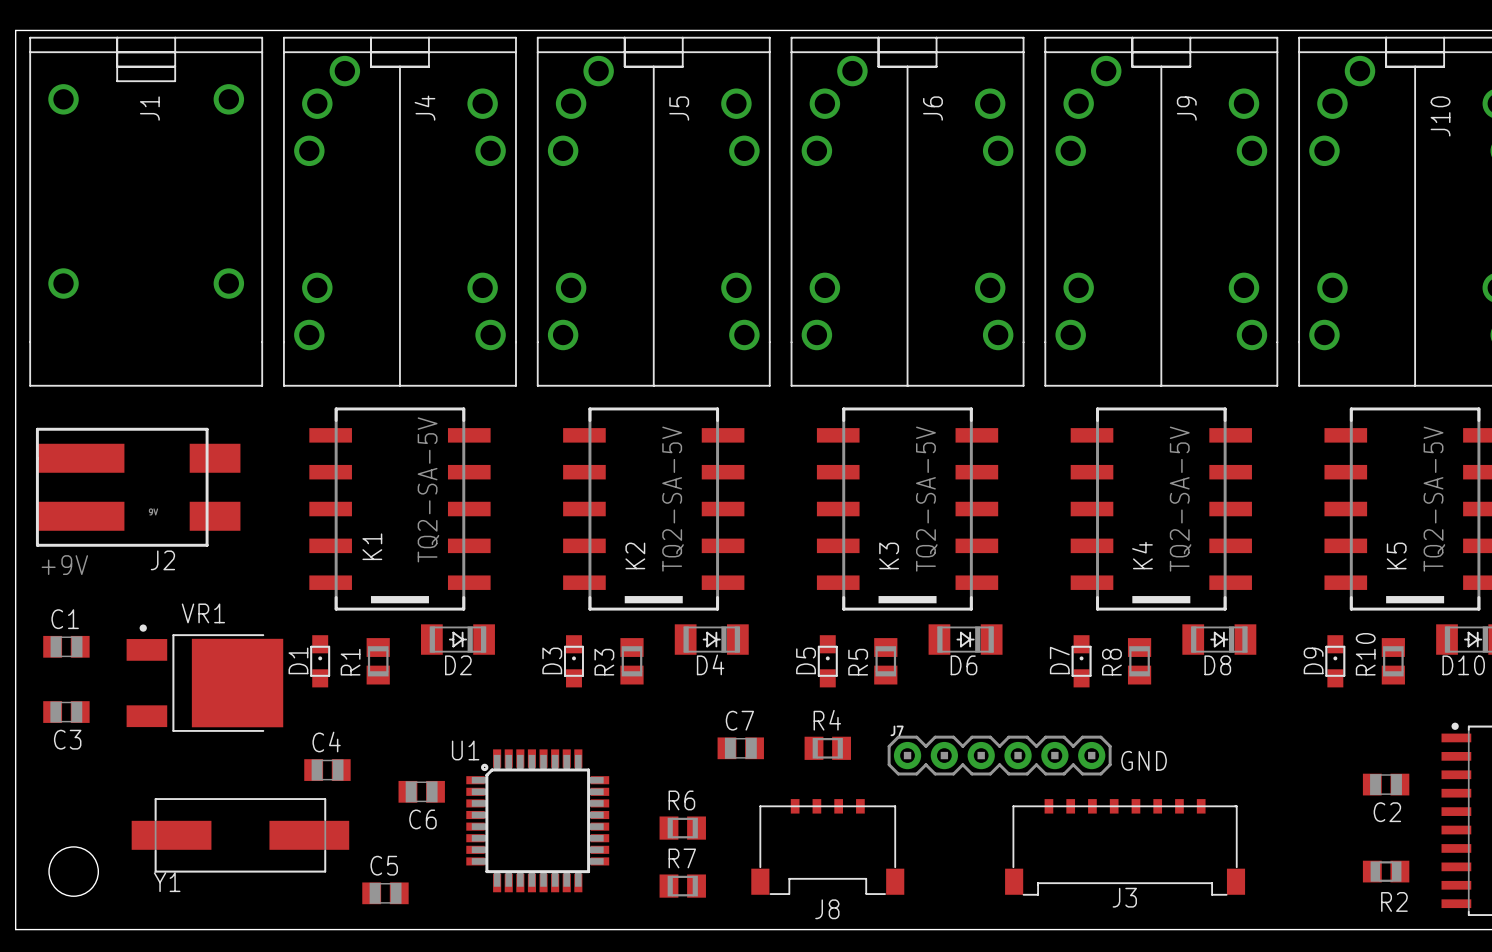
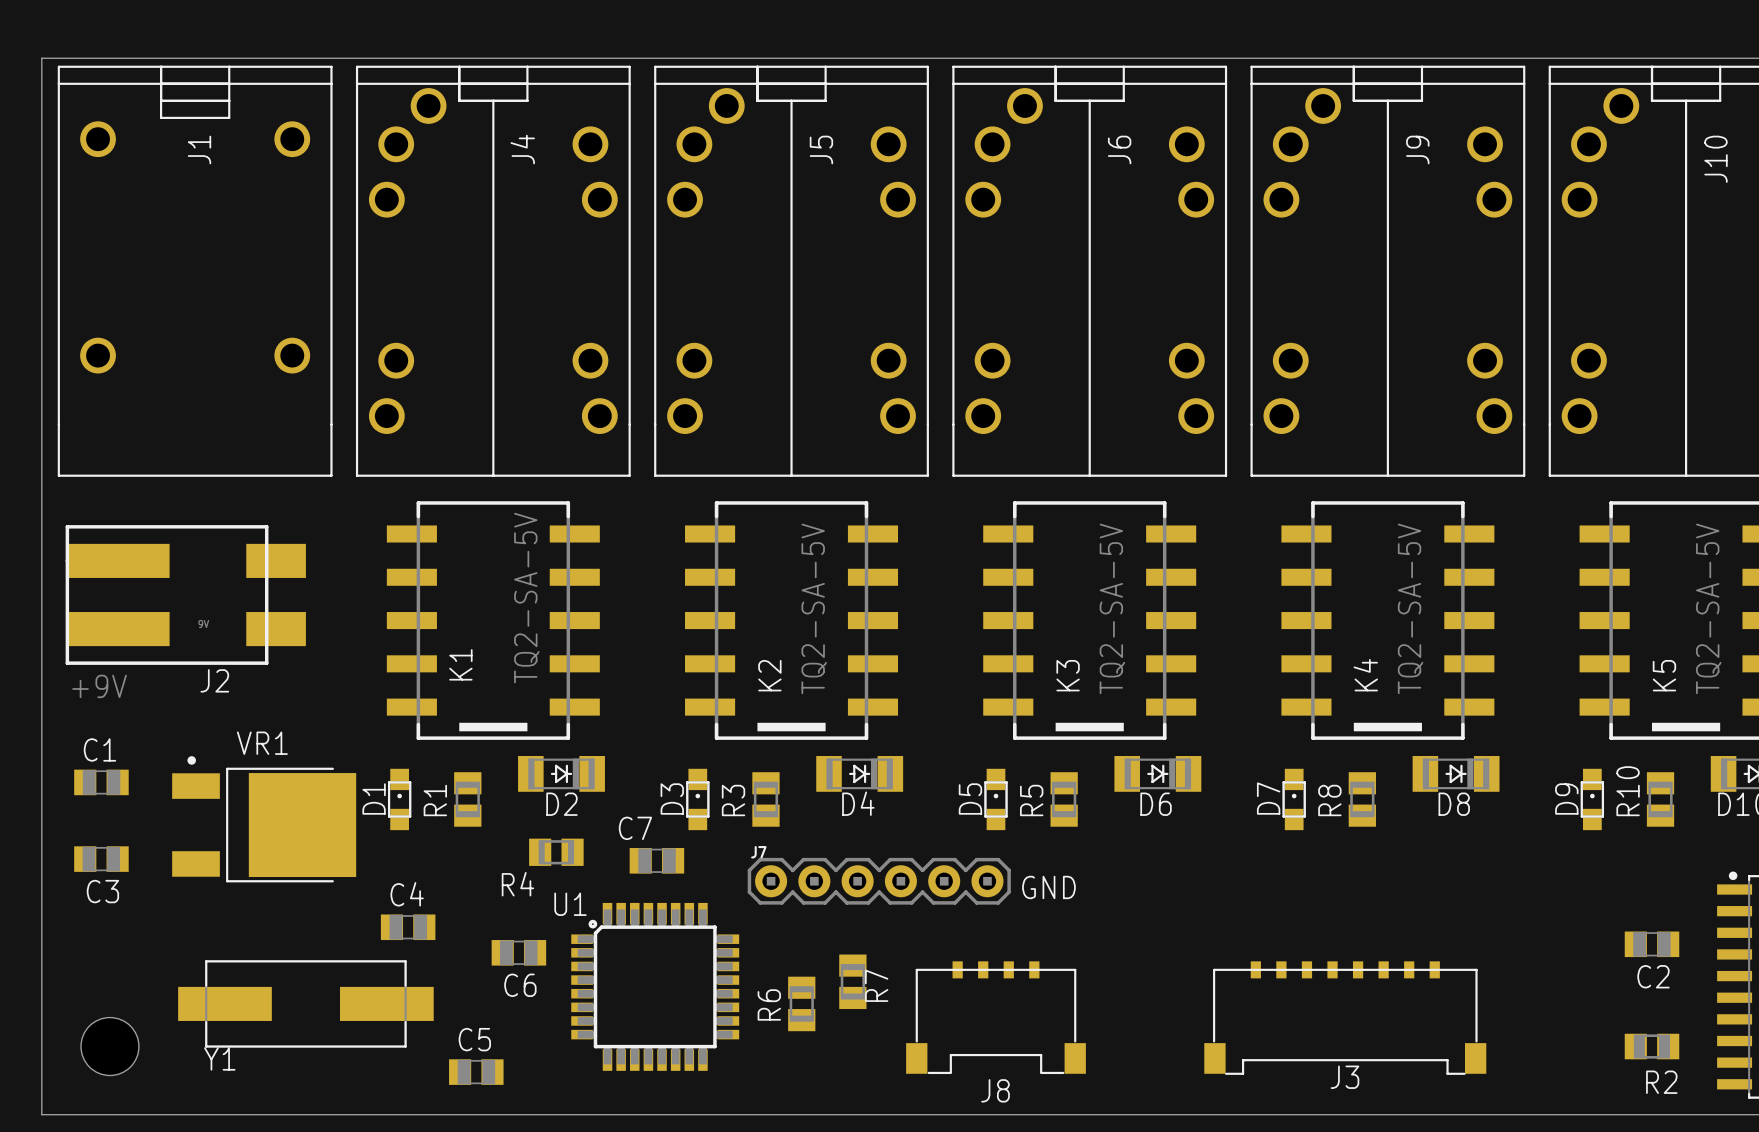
C7 name position: C7 (739, 720) -> C7 (635, 828)
R4 name position: R4 (827, 720) -> R4 (517, 884)
C7 position: (740, 748) -> (656, 860)
R4 position: (827, 748) -> (556, 852)
J7 position: (999, 755) -> (879, 881)
text position: GND (1144, 760) -> GND (1048, 887)
R6 name position: R6 (681, 800) -> R6 (769, 1004)
R6 rotation: 0° (682, 828) -> 90° clockwise (801, 1003)
R7 rotation: 0° (682, 886) -> 90° clockwise (852, 981)
R7 position: (682, 886) -> (852, 981)

